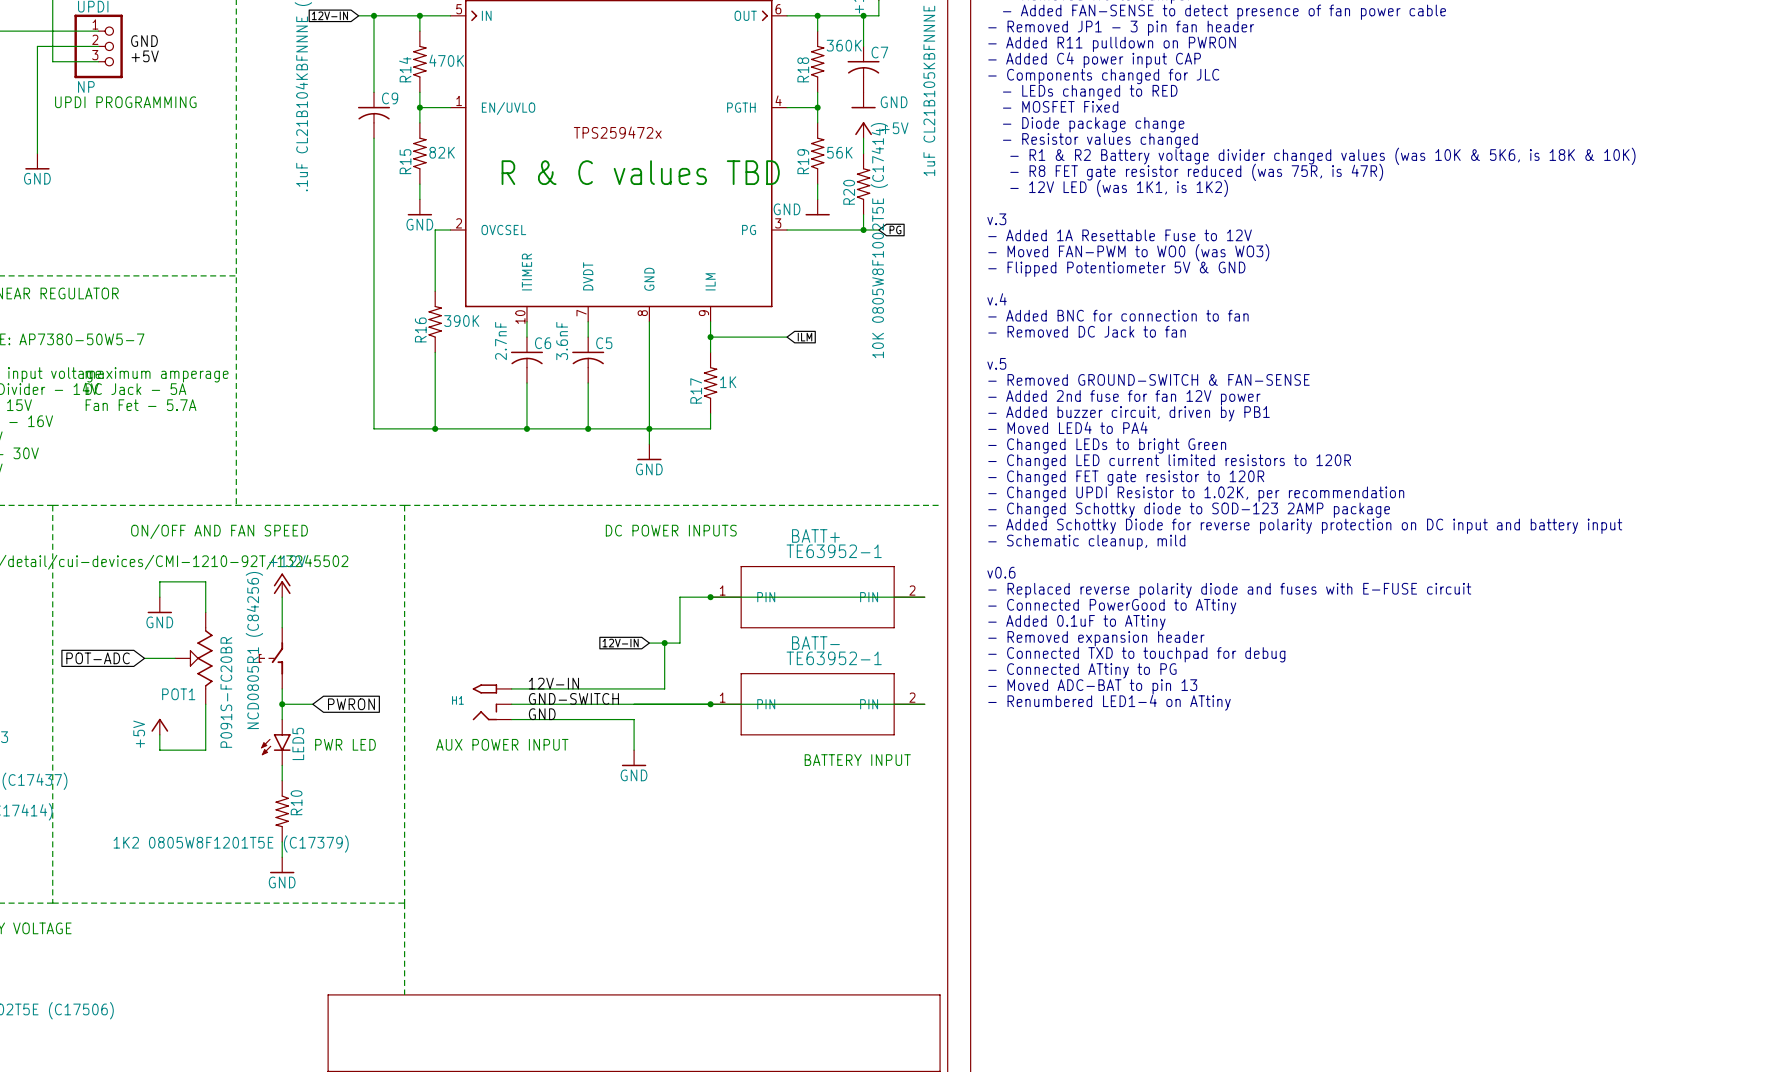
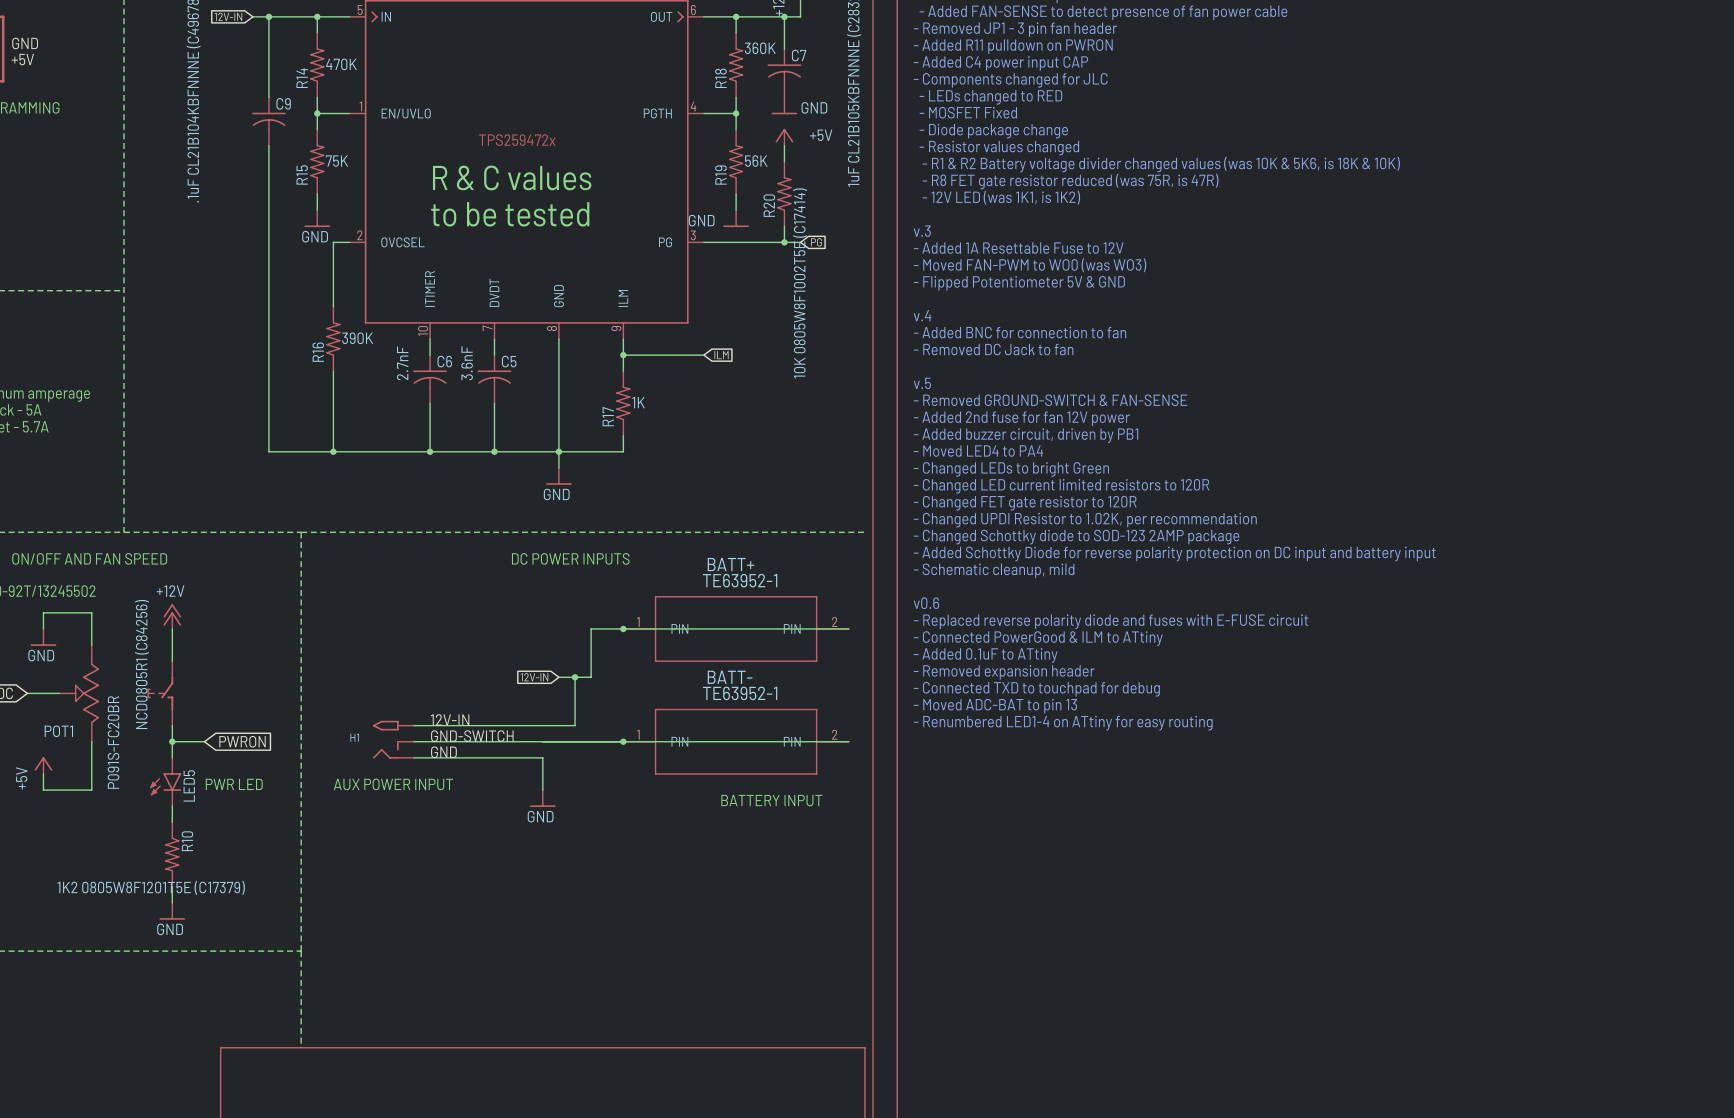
R15 value: 82K (442, 152) -> 75K (336, 161)
text: R & C values TBD (640, 172) -> R & C values (512, 177)
text: none -> to be tested (510, 214)
text: - Connected PowerGood to ATtiny (1112, 606) -> - Connected PowerGood & ILM to ATtiny (1038, 638)
text: - Connected ATtiny to PG (1082, 670) -> - Moved ADC-BAT to pin 13 (995, 706)
text: - Moved ADC-BAT to pin 13 (1092, 686) -> - Renumbered LED1-4 on ATtiny for easy routing (1063, 723)
text: - Renumbered LED1-4 on ATtiny (1109, 702) -> none

